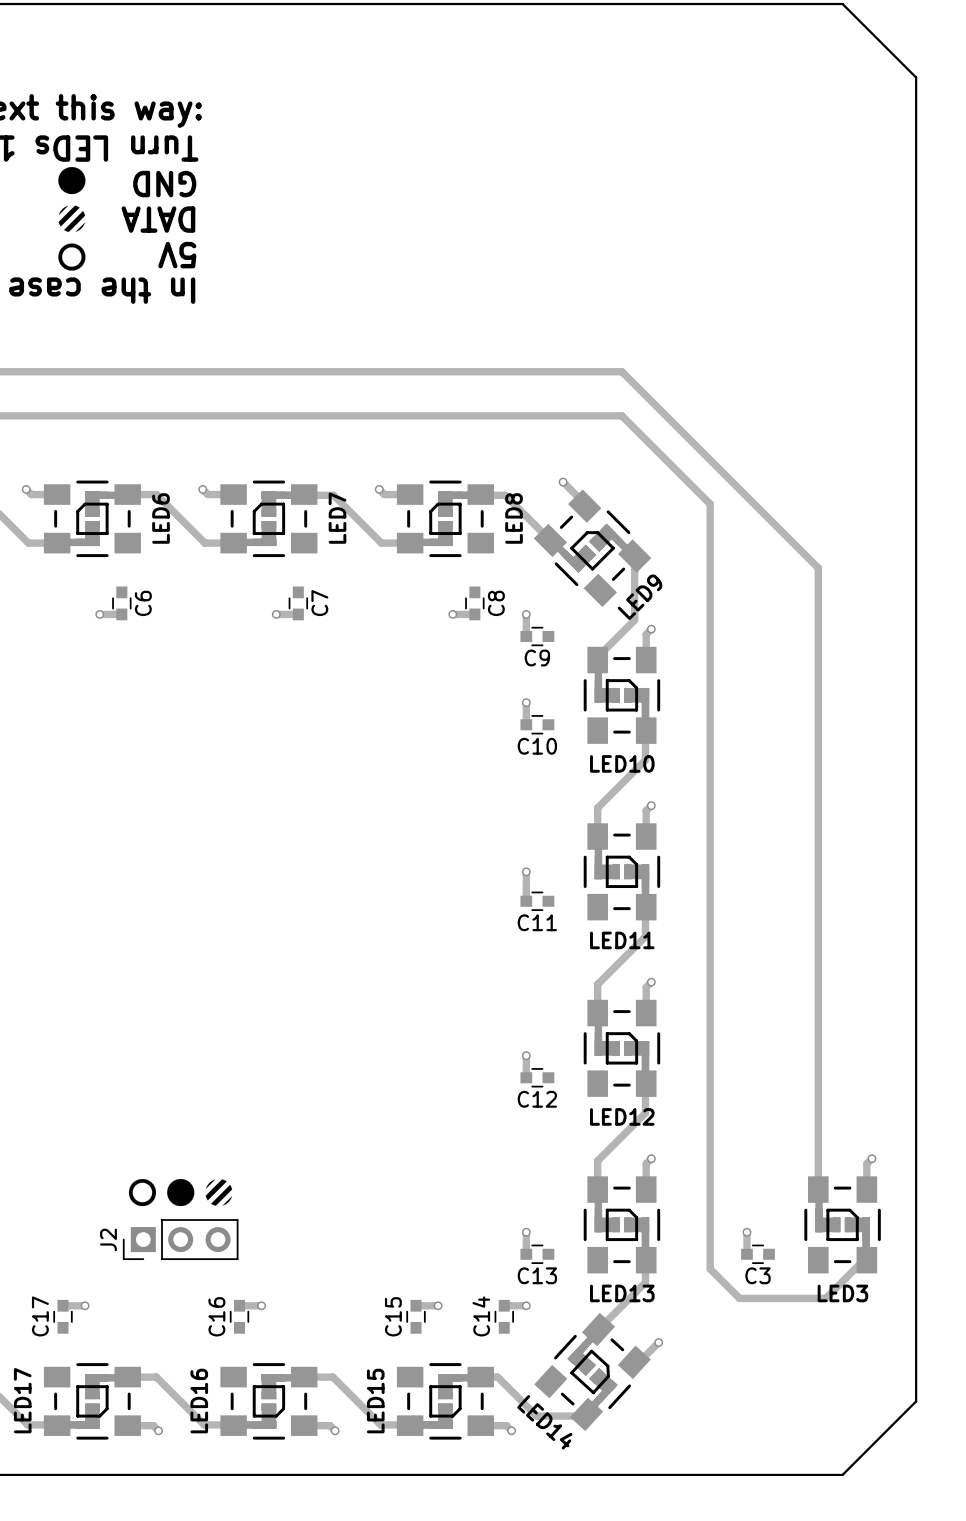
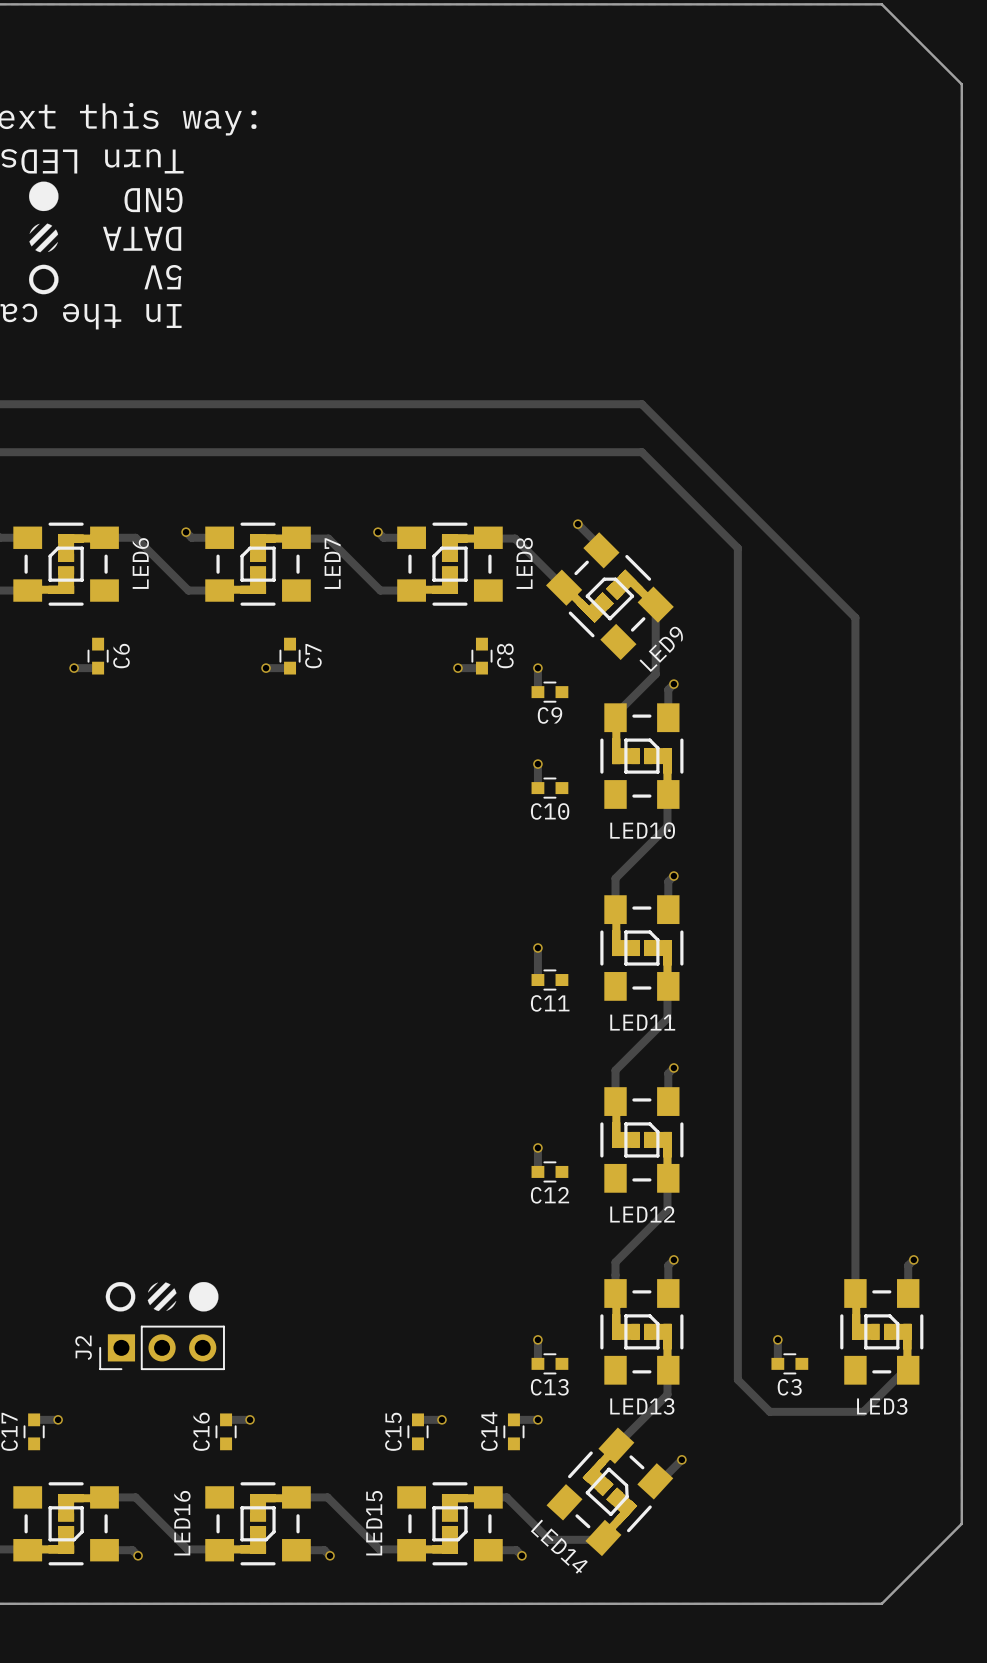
drawing position: (180, 1192) -> (203, 1296)
drawing position: (218, 1192) -> (162, 1296)

